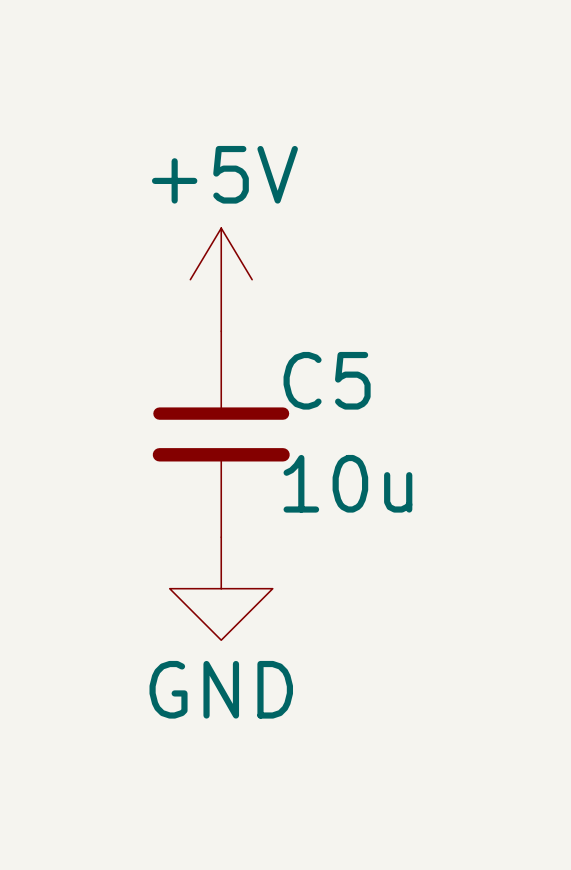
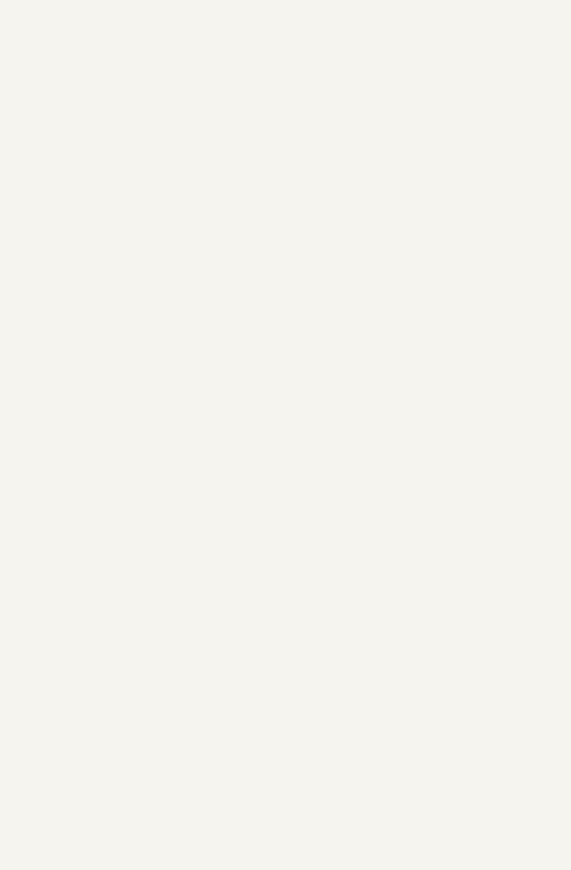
power symbol: +5V (221, 279) -> none
C5: 10u (221, 434) -> none
power symbol: GND (221, 588) -> none

